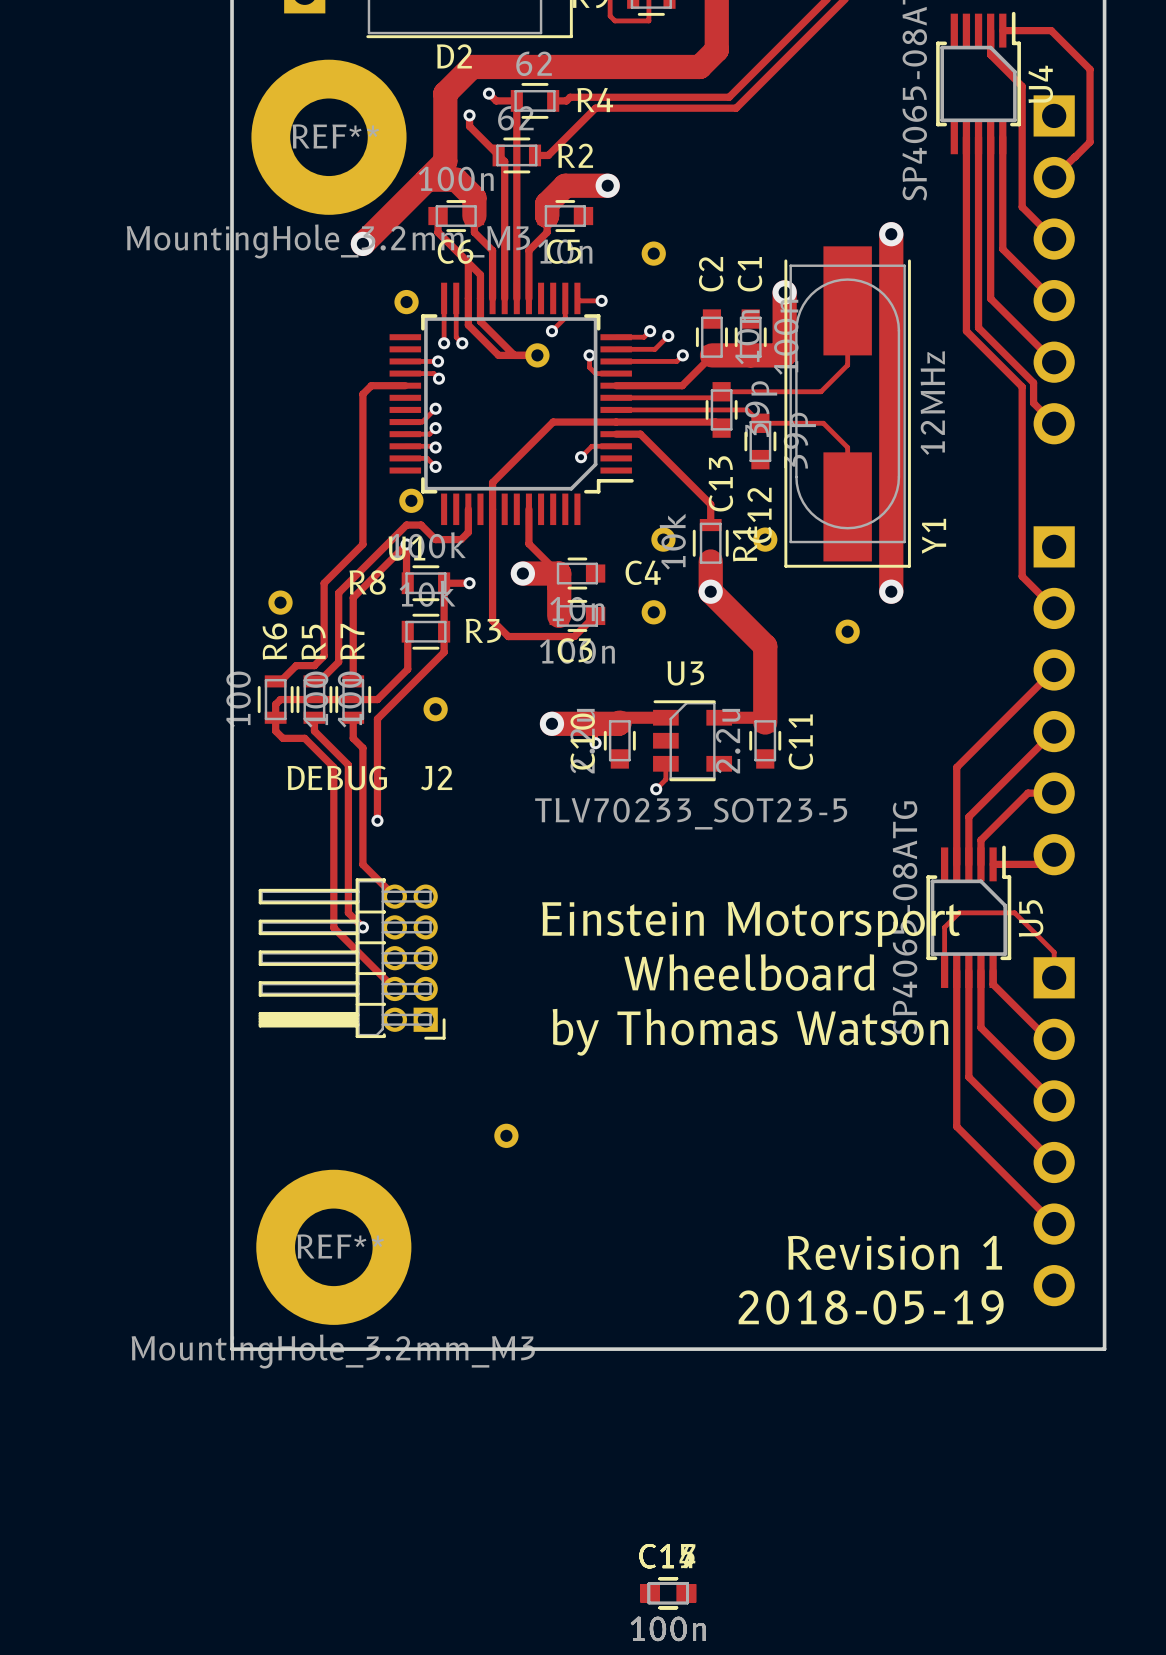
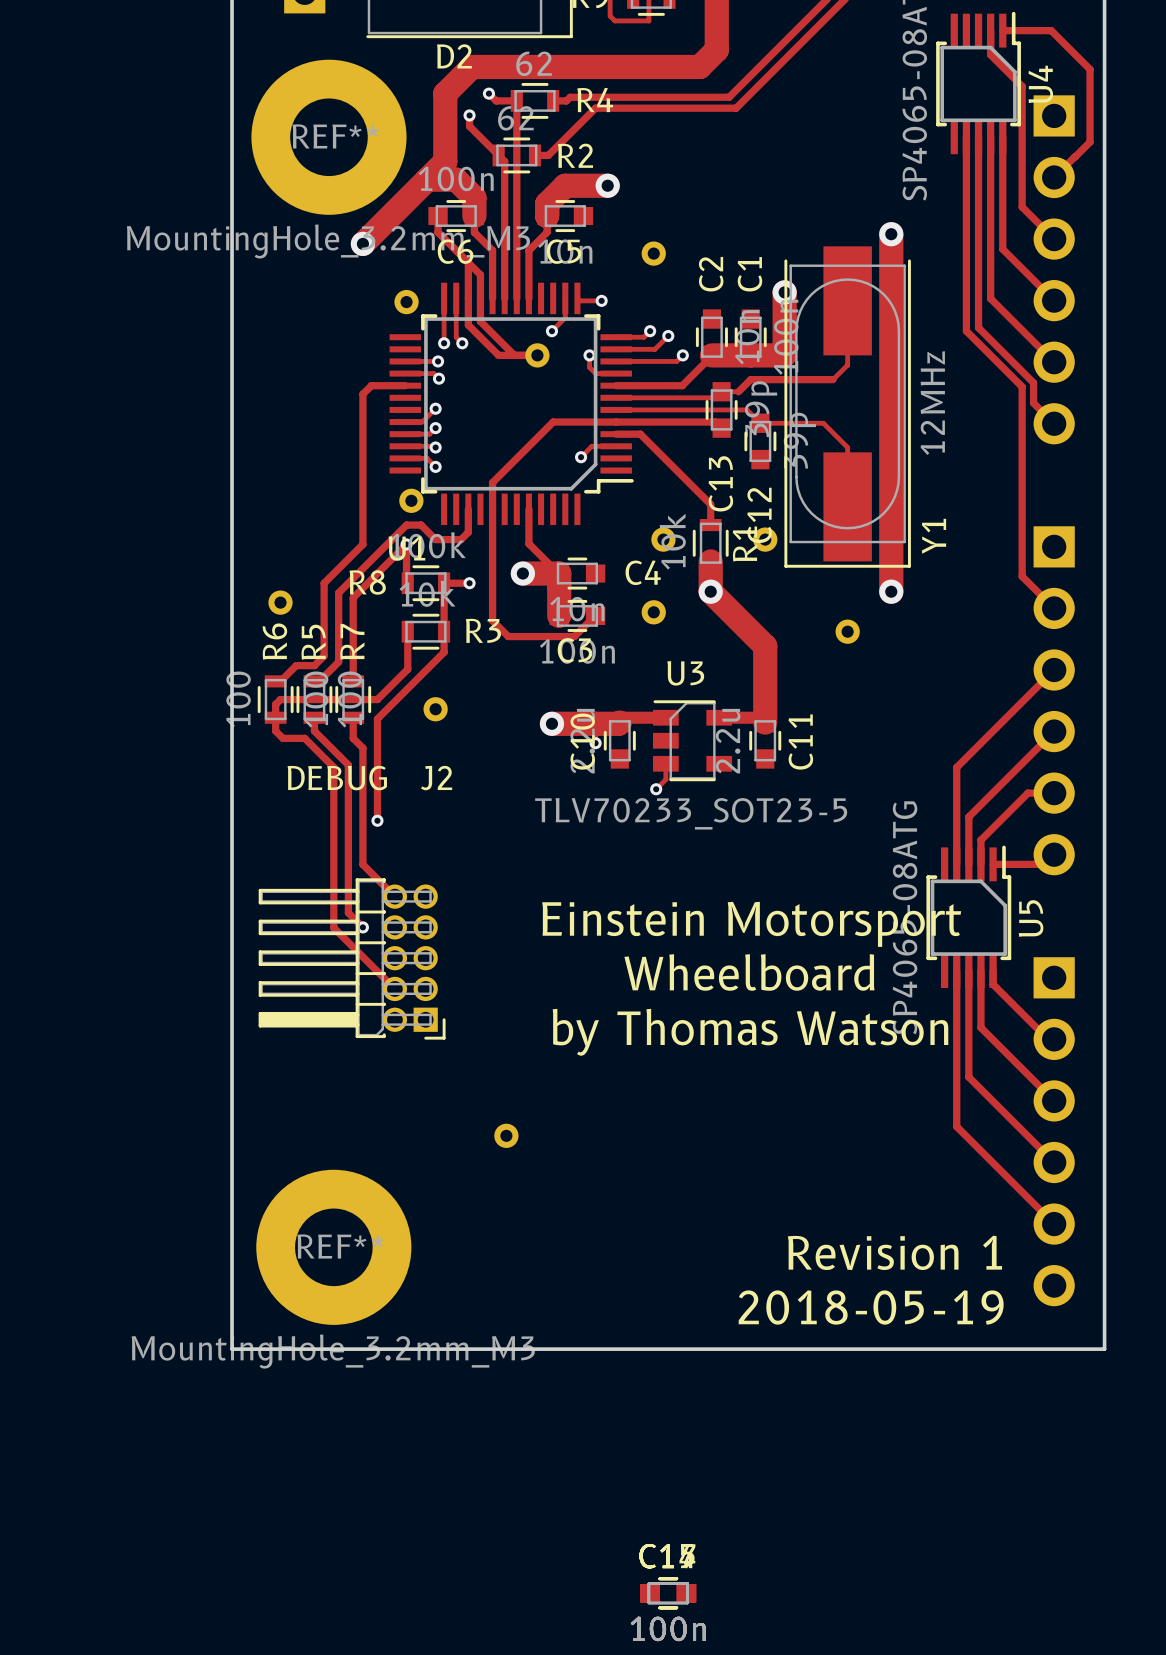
track: (833, 379) (821, 391) (738, 391) -> (833, 379) (750, 379) (738, 391)
track: (944, 971) (944, 927) (959, 912) (1014, 912) (1054, 952) (1054, 977) -> none

